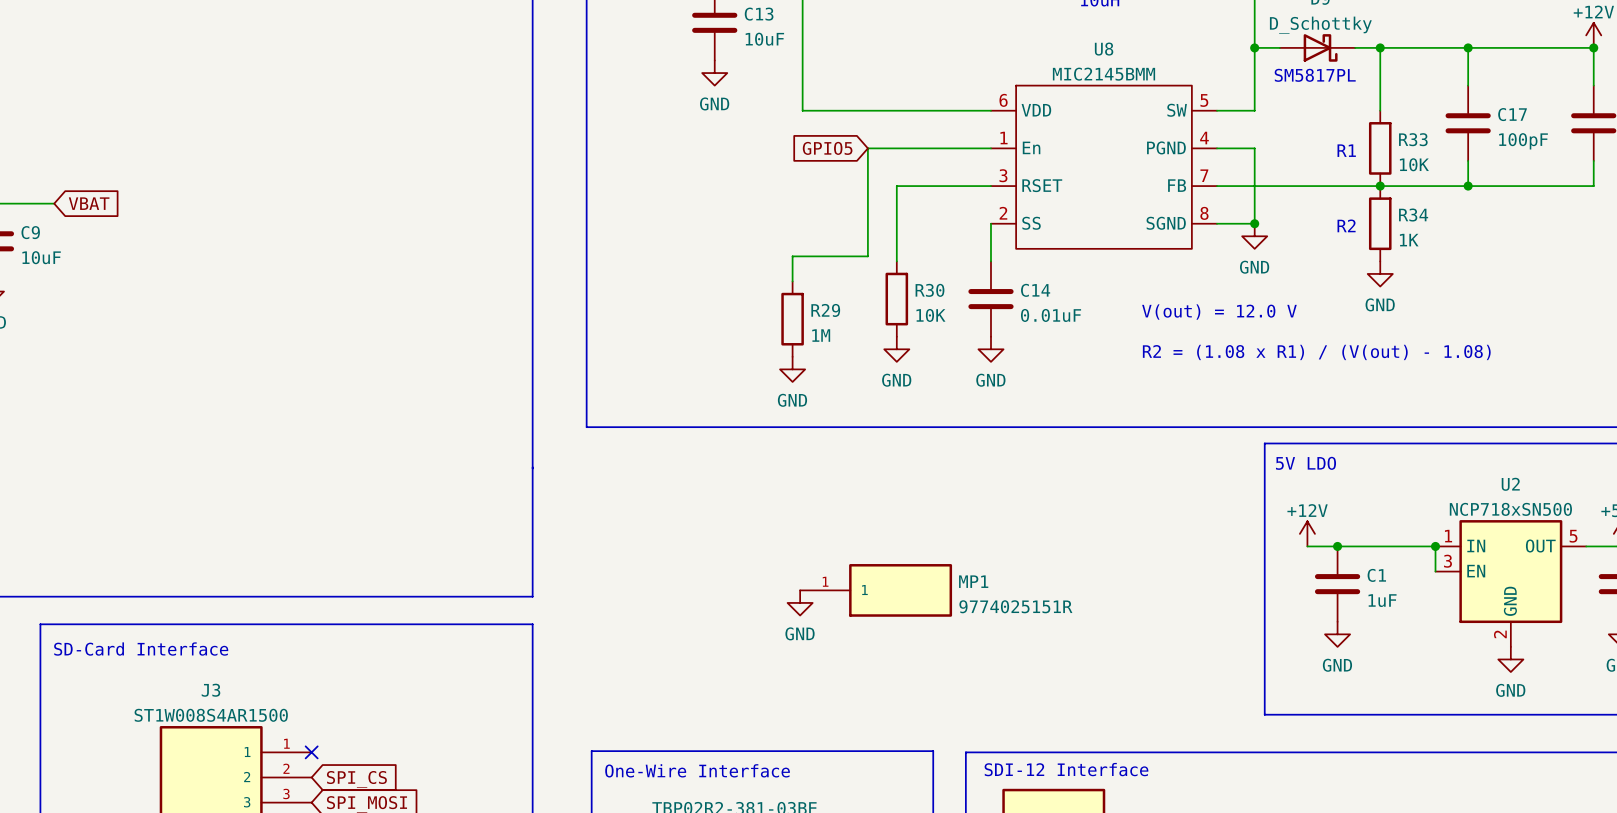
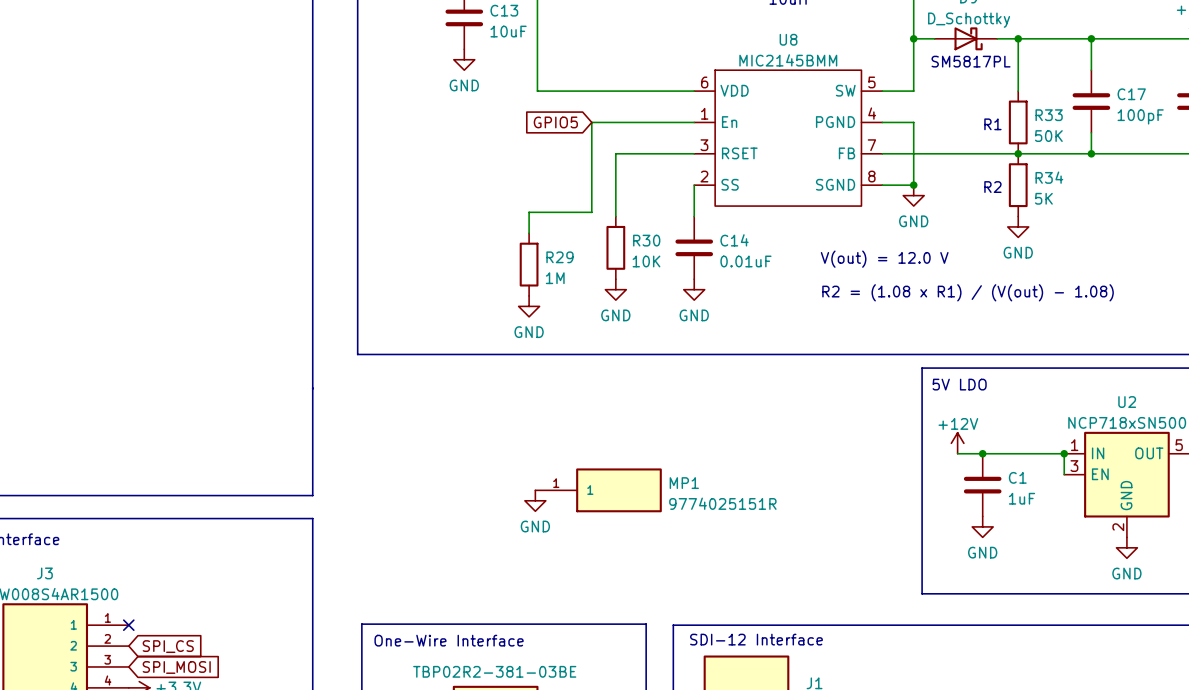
R33 value: 10K (1414, 164) -> 50K (1048, 136)
R34 value: 1K (1409, 240) -> 5K (1043, 198)

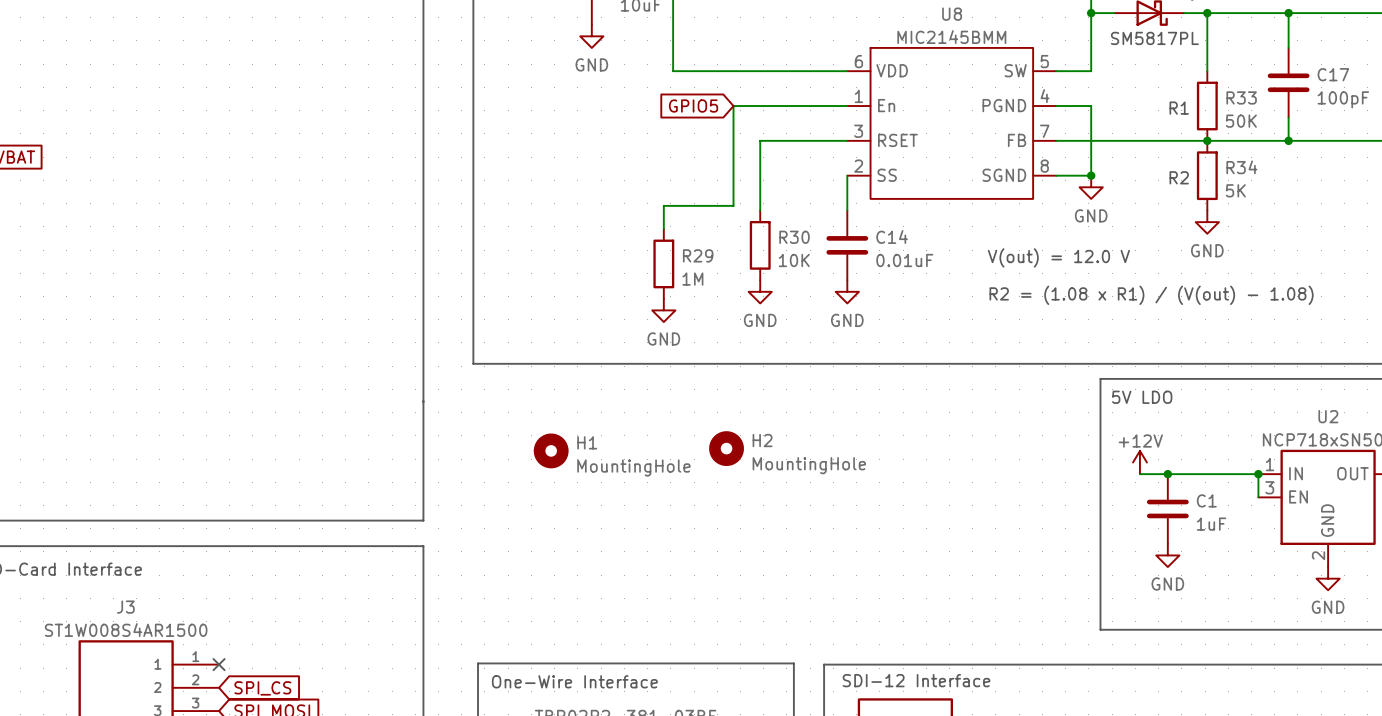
H2: none -> MountingHole (726, 448)
H1: none -> MountingHole (551, 450)
MP1: 9774025151R (598, 490) -> none
power symbol: GND (535, 500) -> none

